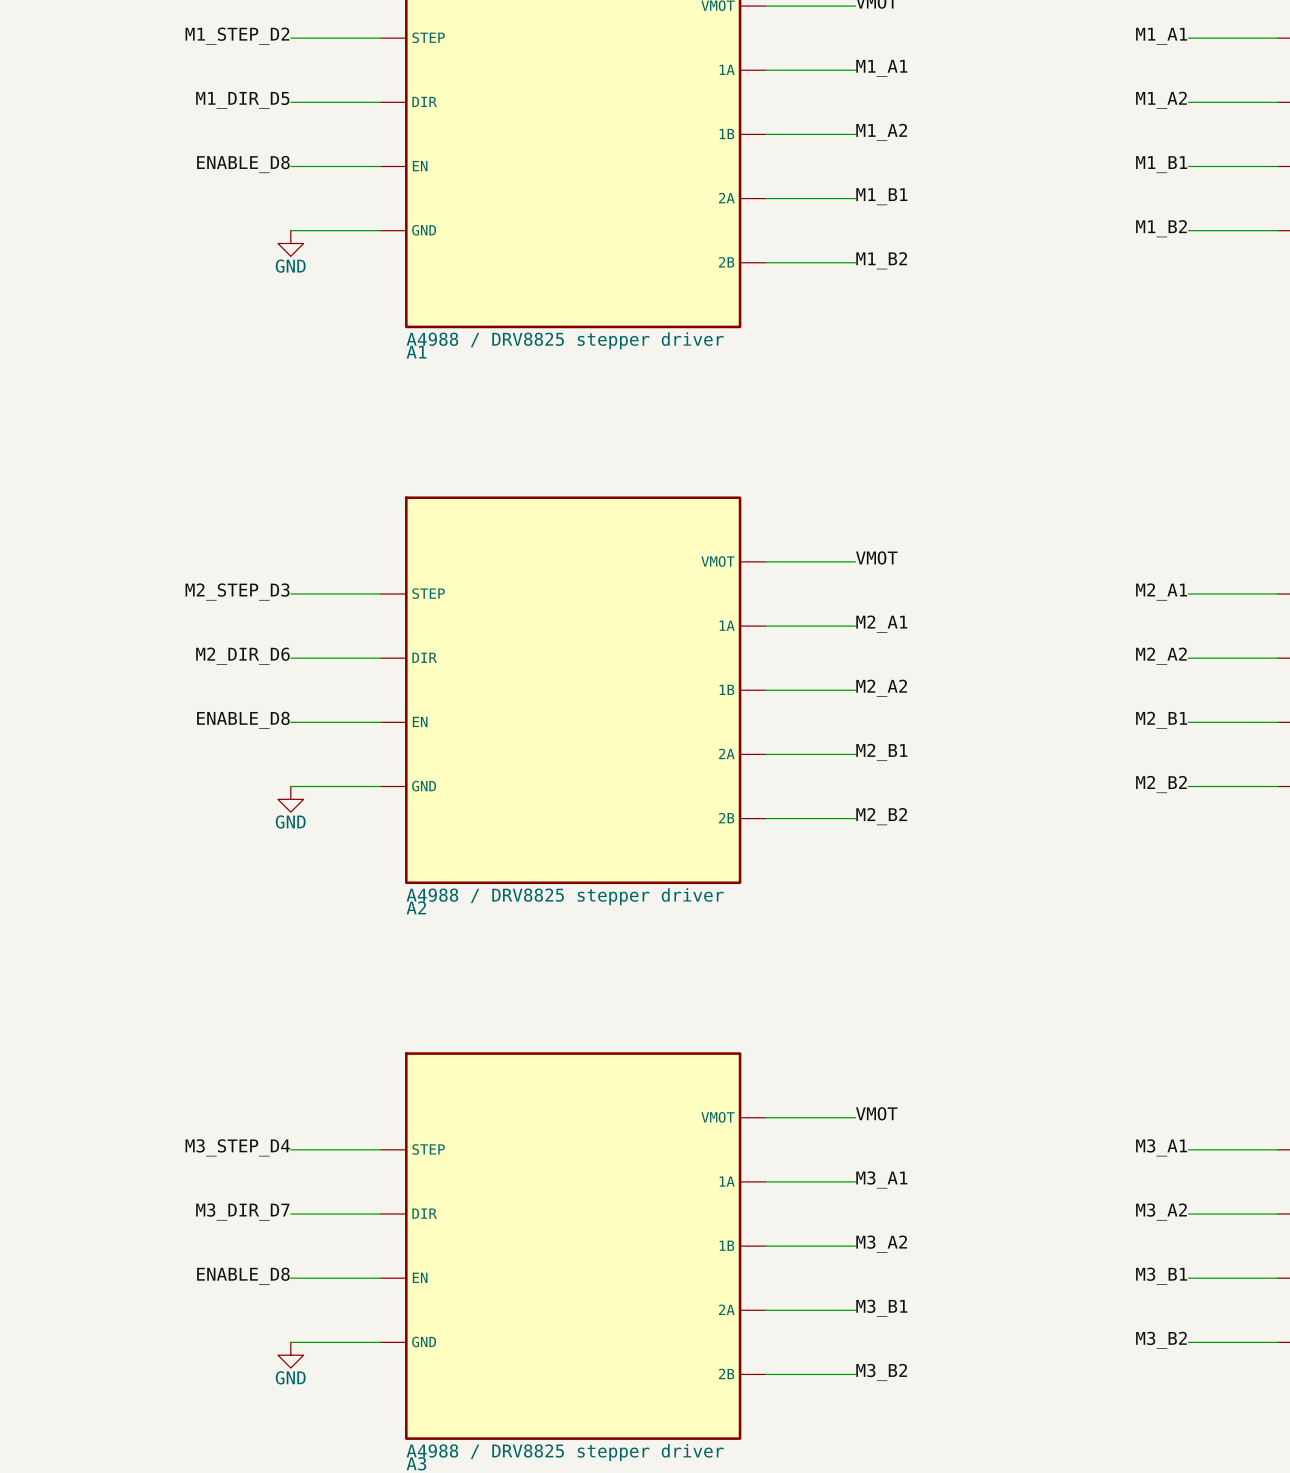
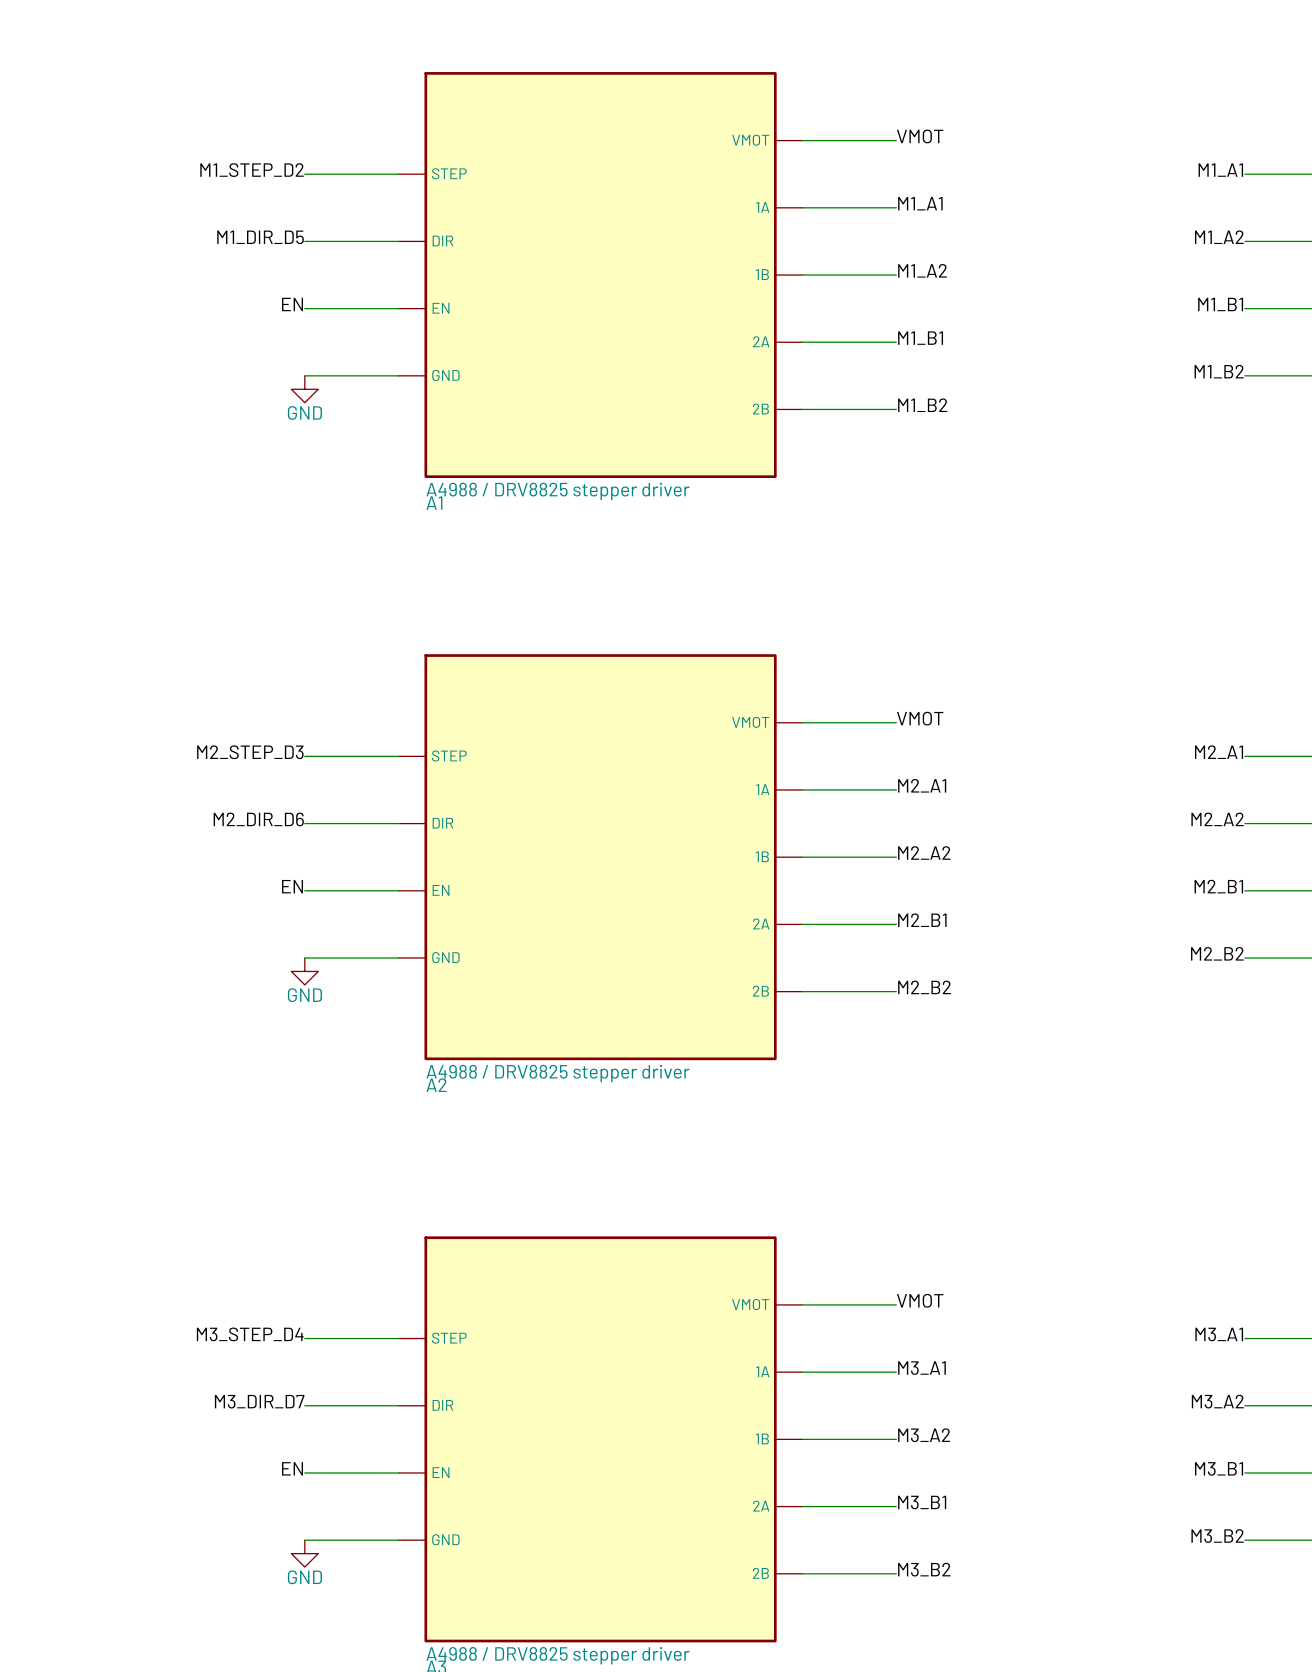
label: ENABLE_D8 (243, 164) -> EN (292, 304)
label: ENABLE_D8 (243, 720) -> EN (292, 886)
label: ENABLE_D8 (243, 1276) -> EN (292, 1468)

